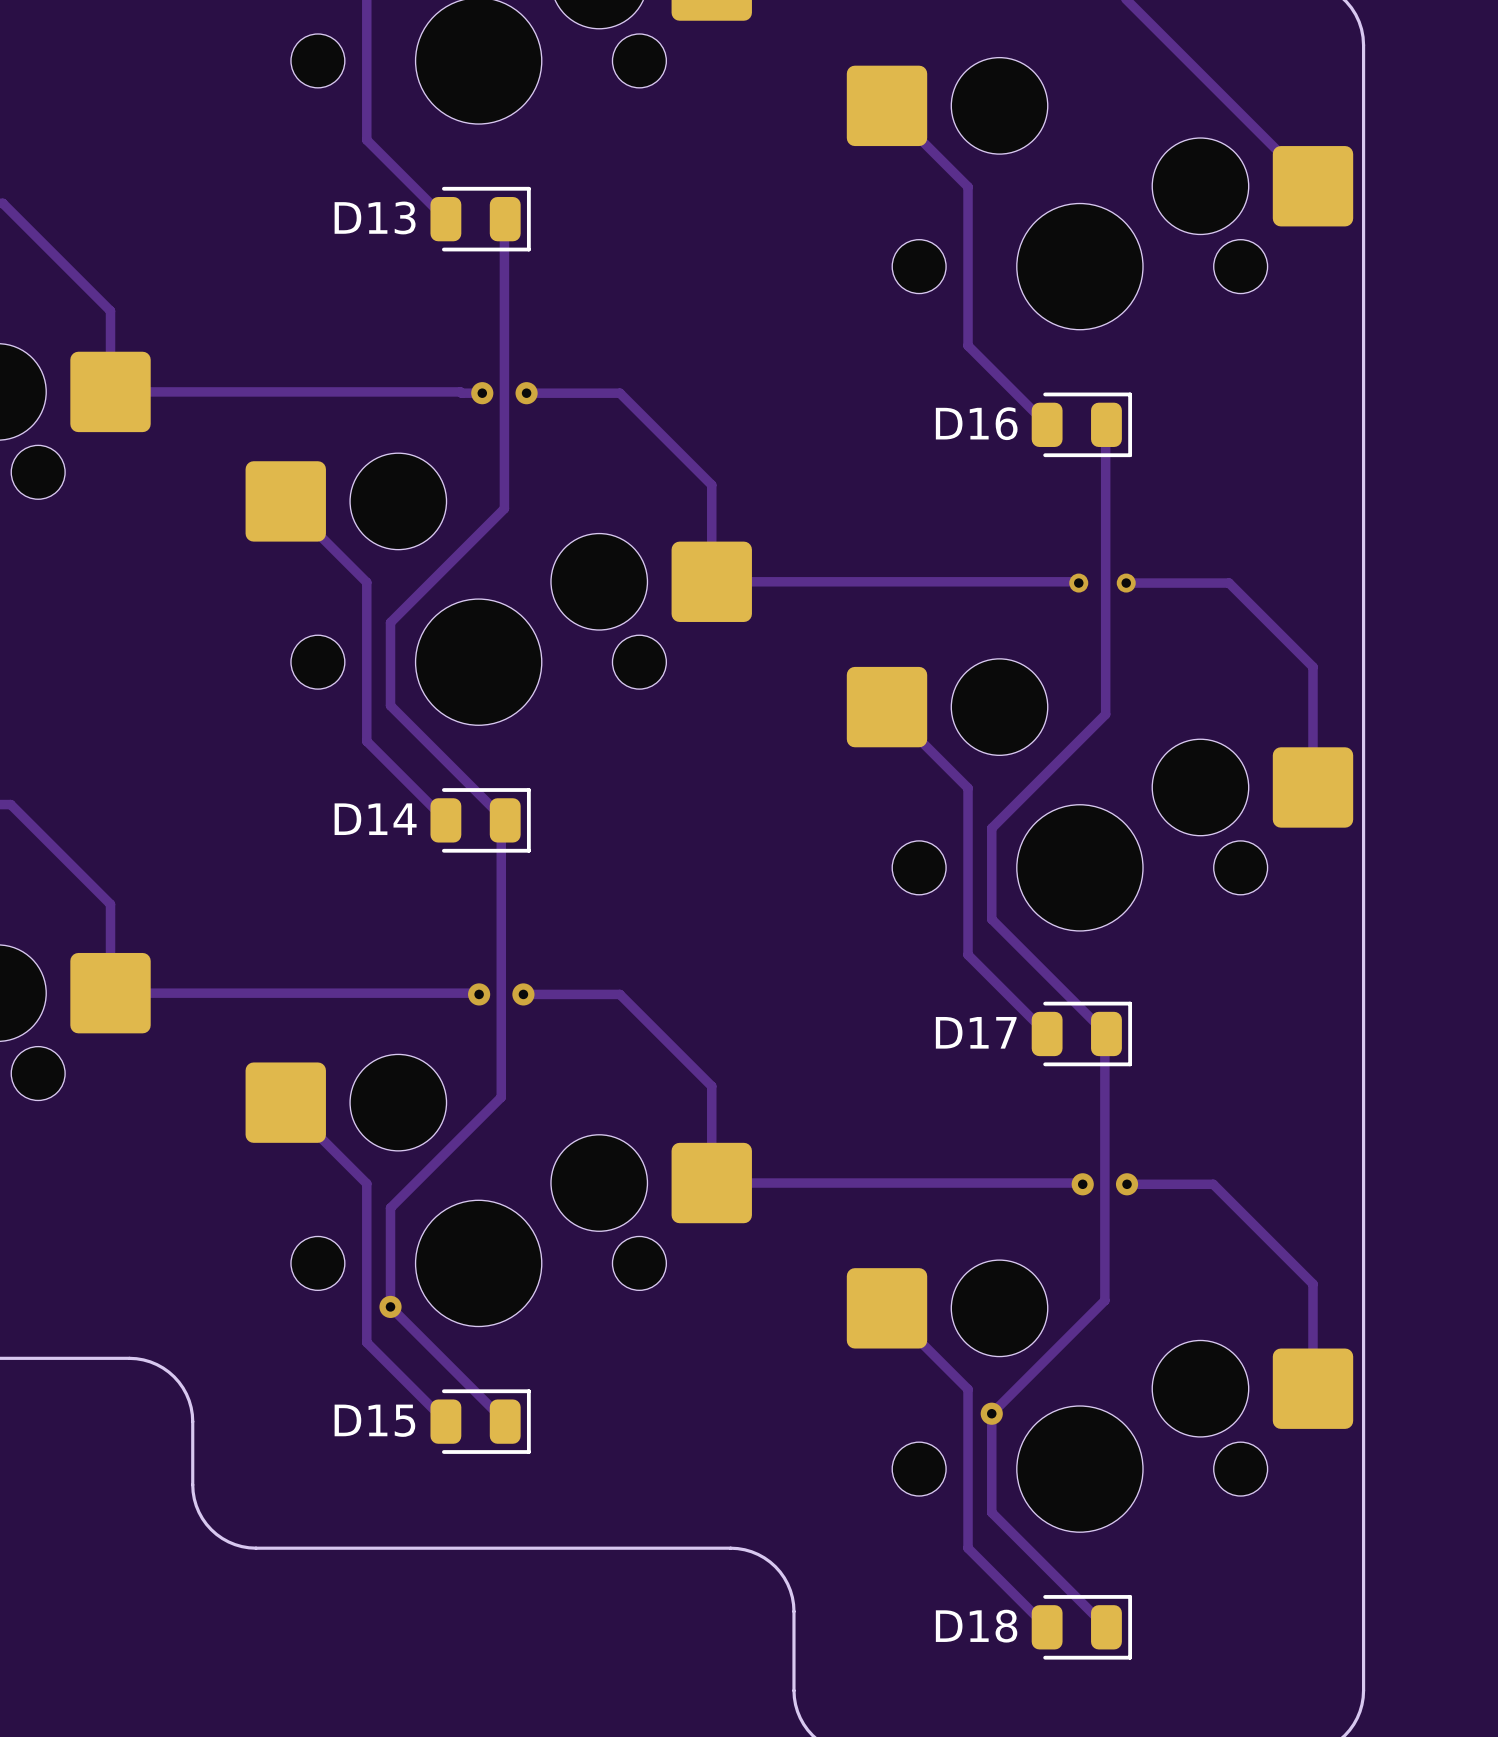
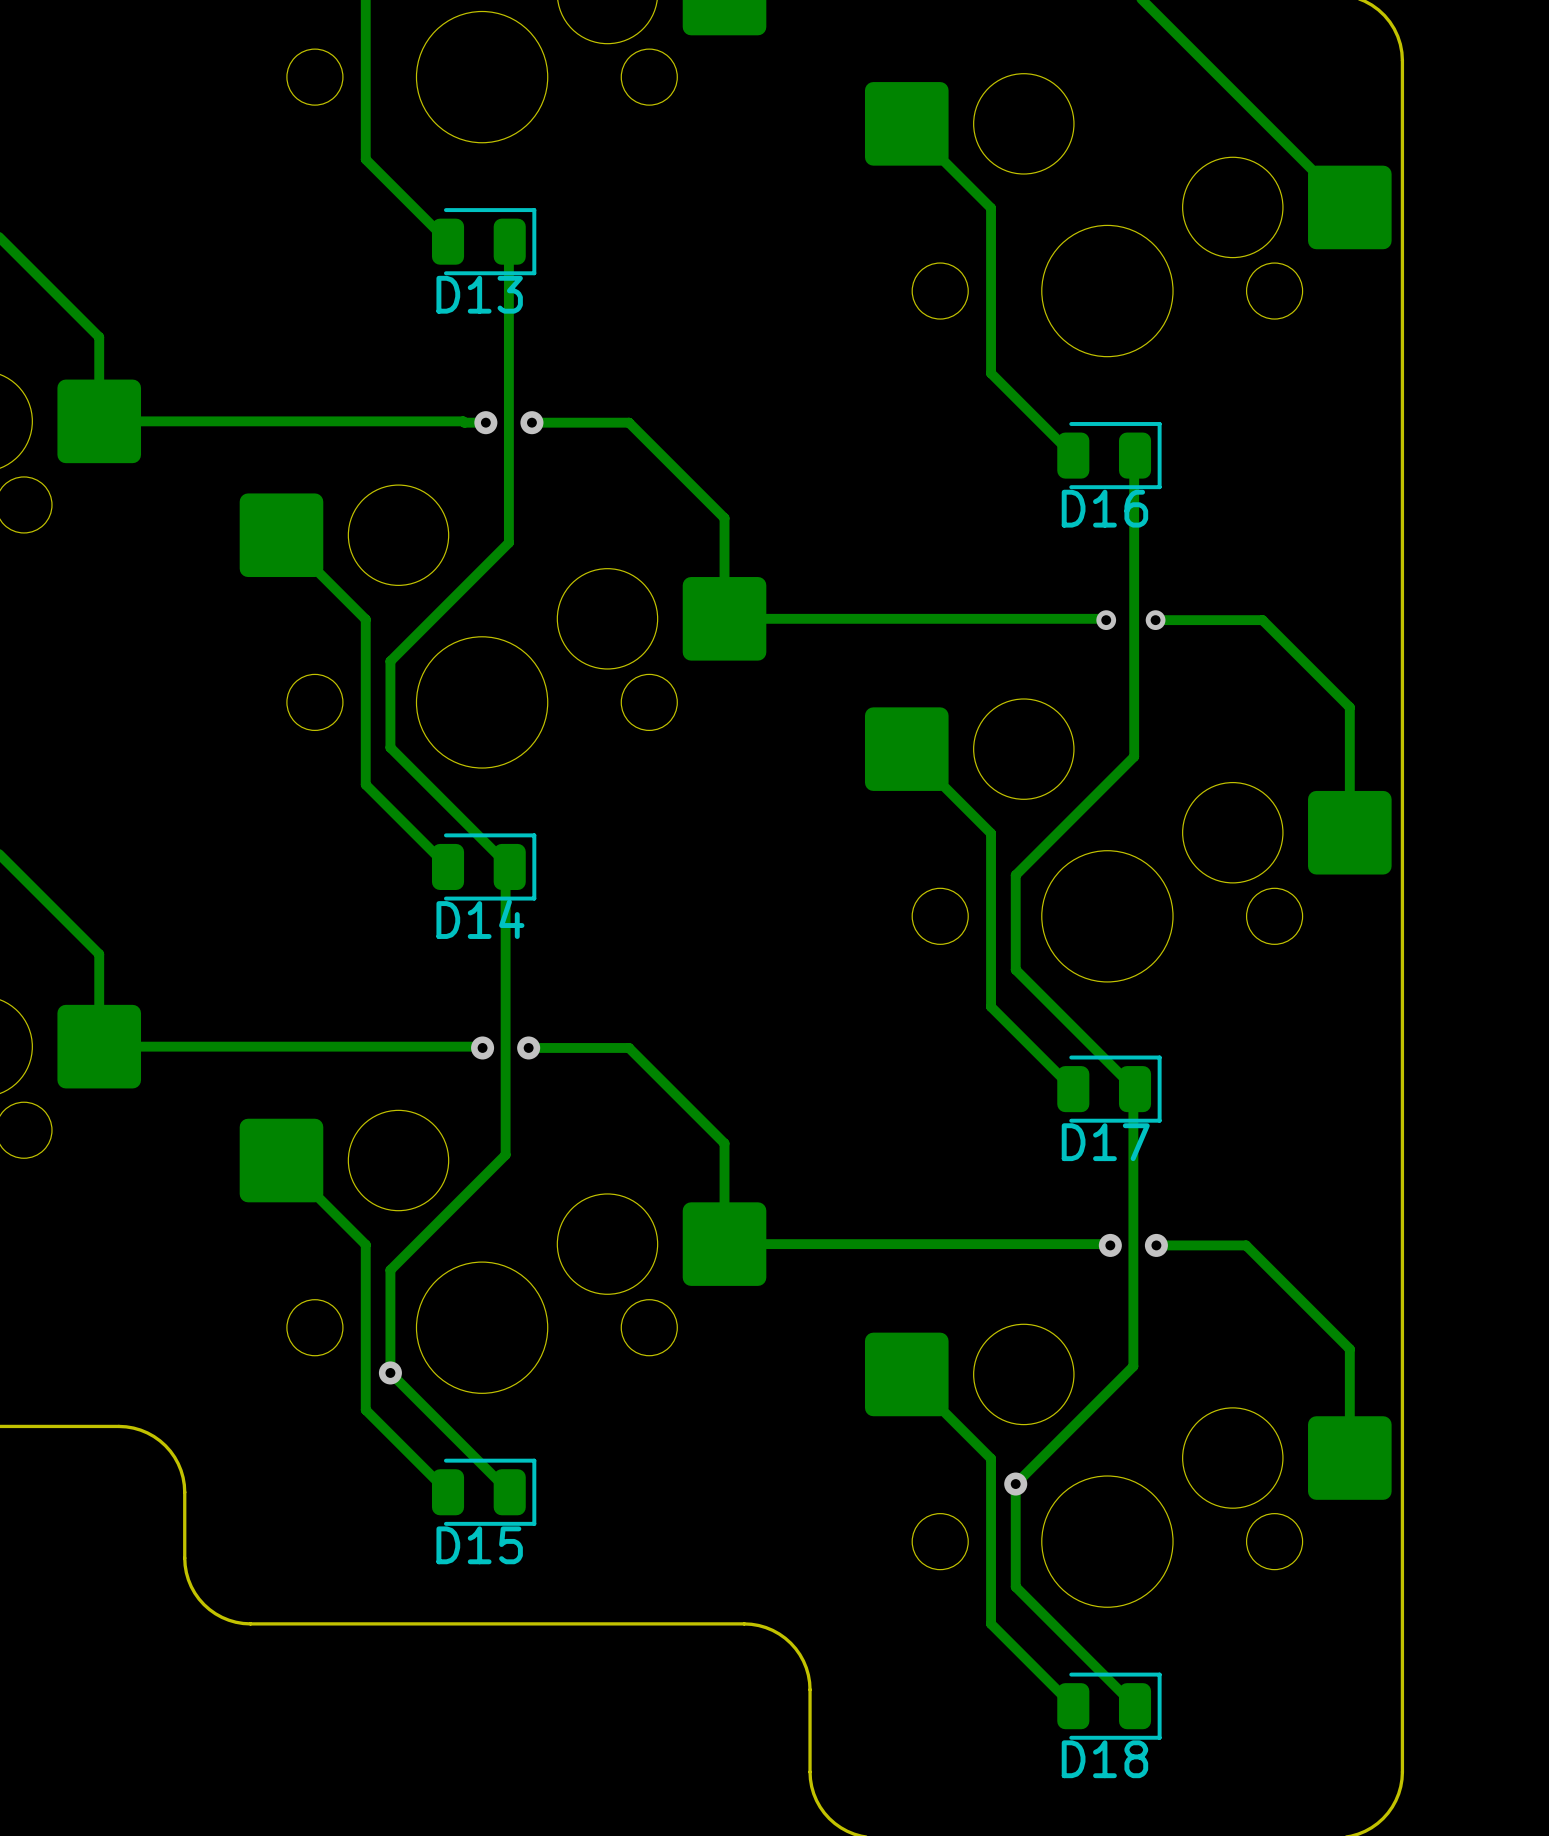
D13 name position: D13 (375, 217) -> D13 (479, 294)
D16 name position: D16 (976, 423) -> D16 (1104, 508)
D14 name position: D14 (375, 819) -> D14 (480, 919)
D17 name position: D17 (976, 1032) -> D17 (1105, 1142)
D15 name position: D15 (374, 1420) -> D15 (479, 1545)
D18 name position: D18 (976, 1626) -> D18 (1104, 1759)

